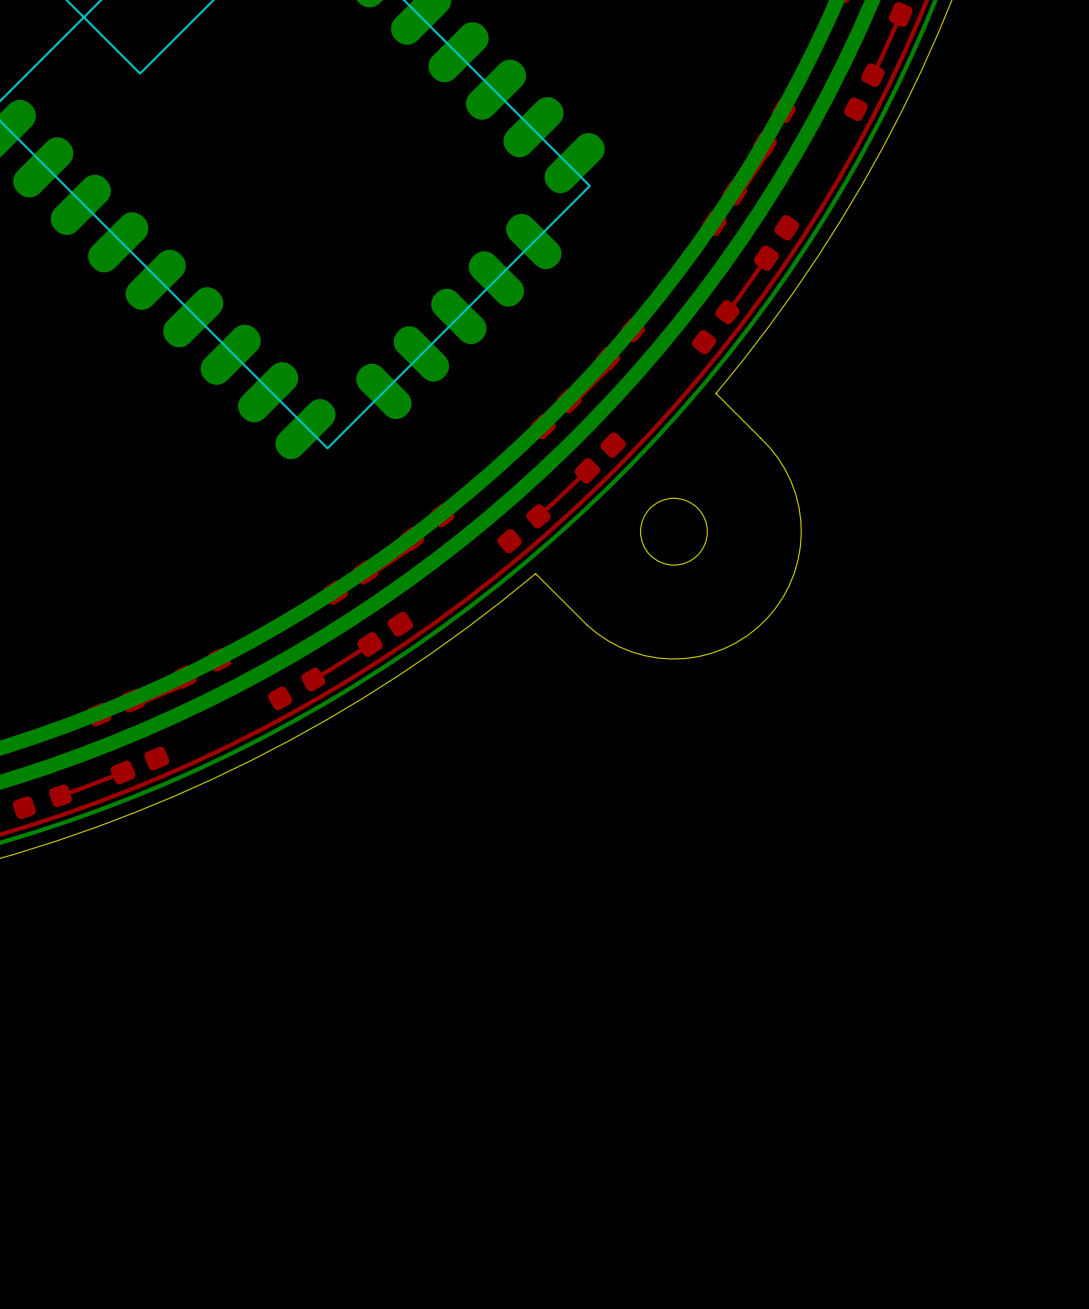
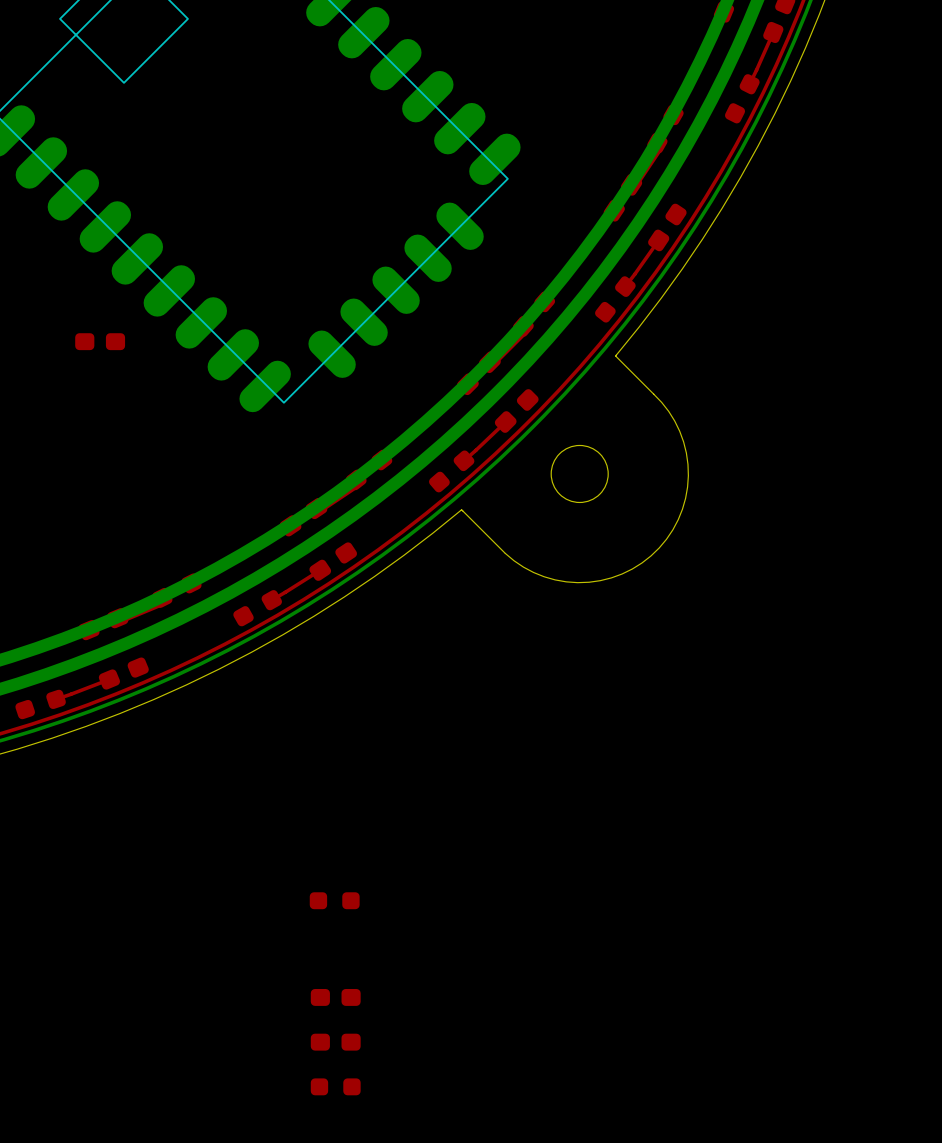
part: none -> (100, 341)
part: none -> (334, 900)
part: none -> (335, 997)
part: none -> (335, 1042)
part: none -> (335, 1086)

